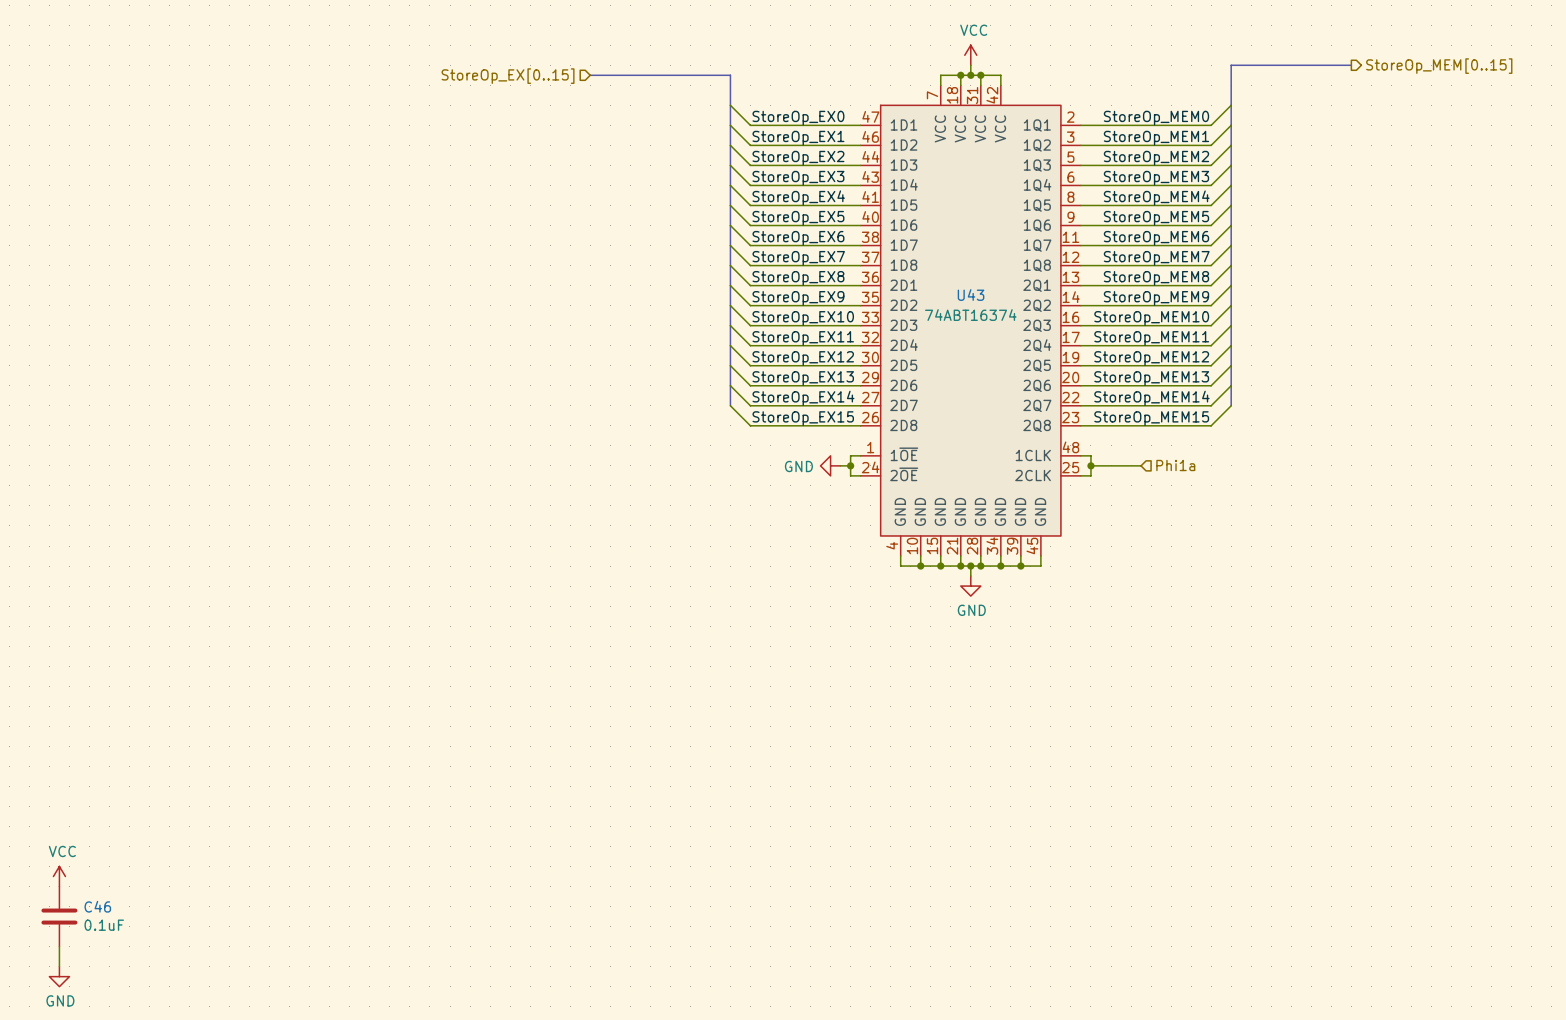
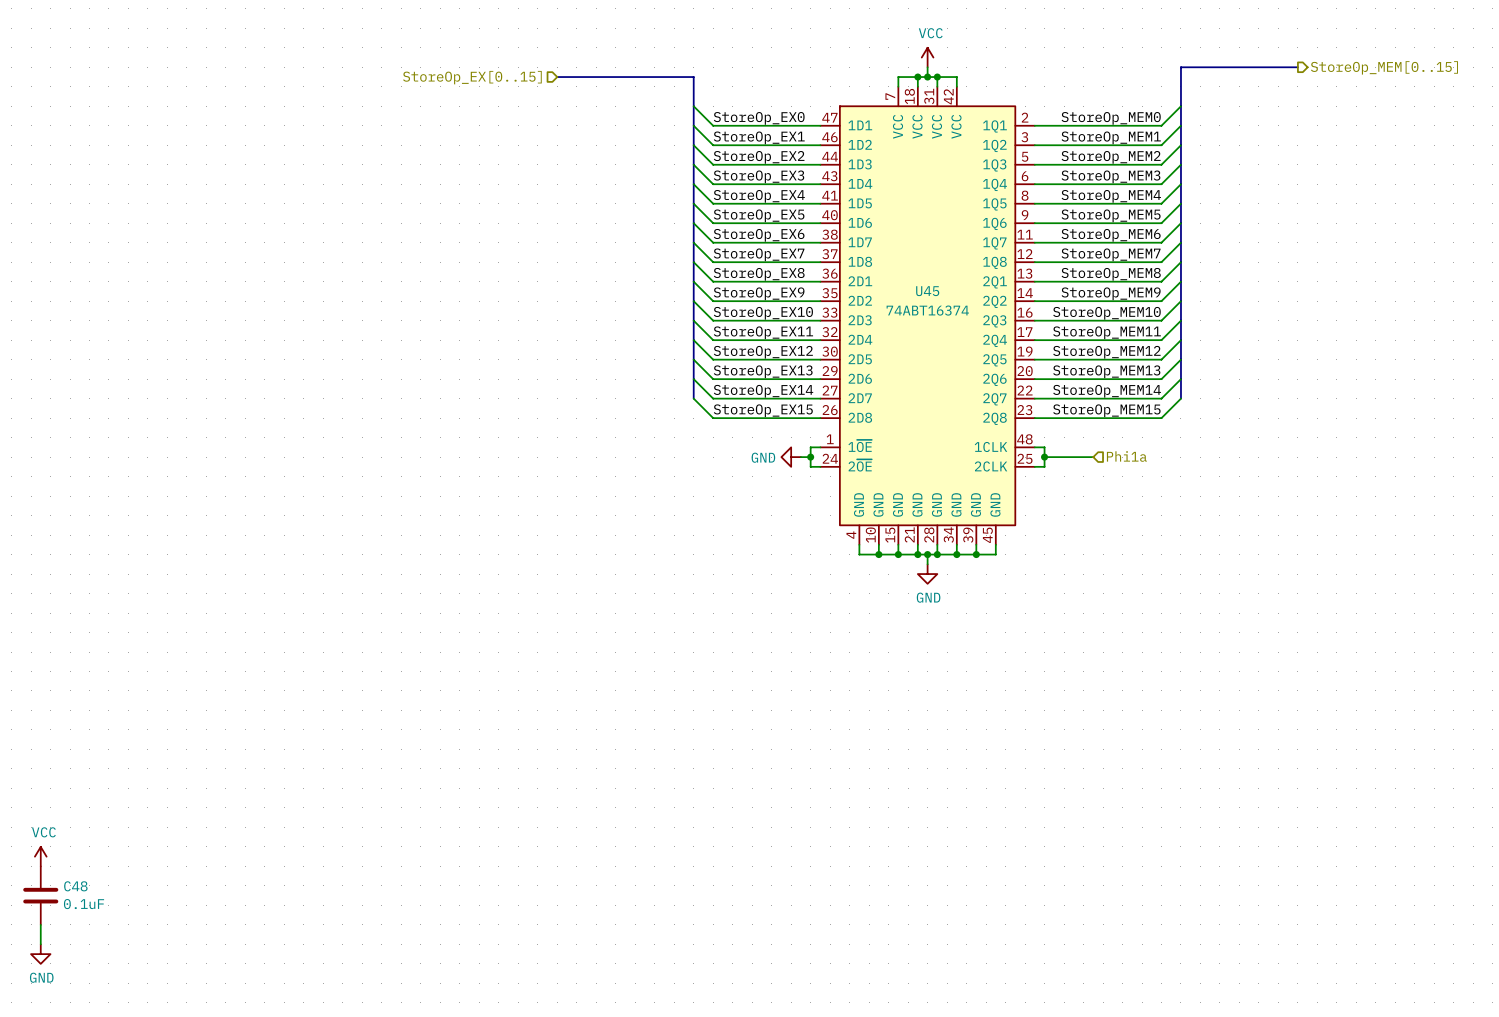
U43 name: U43 (971, 295) -> U45 (927, 291)
C46 name: C46 (97, 906) -> C48 (75, 886)

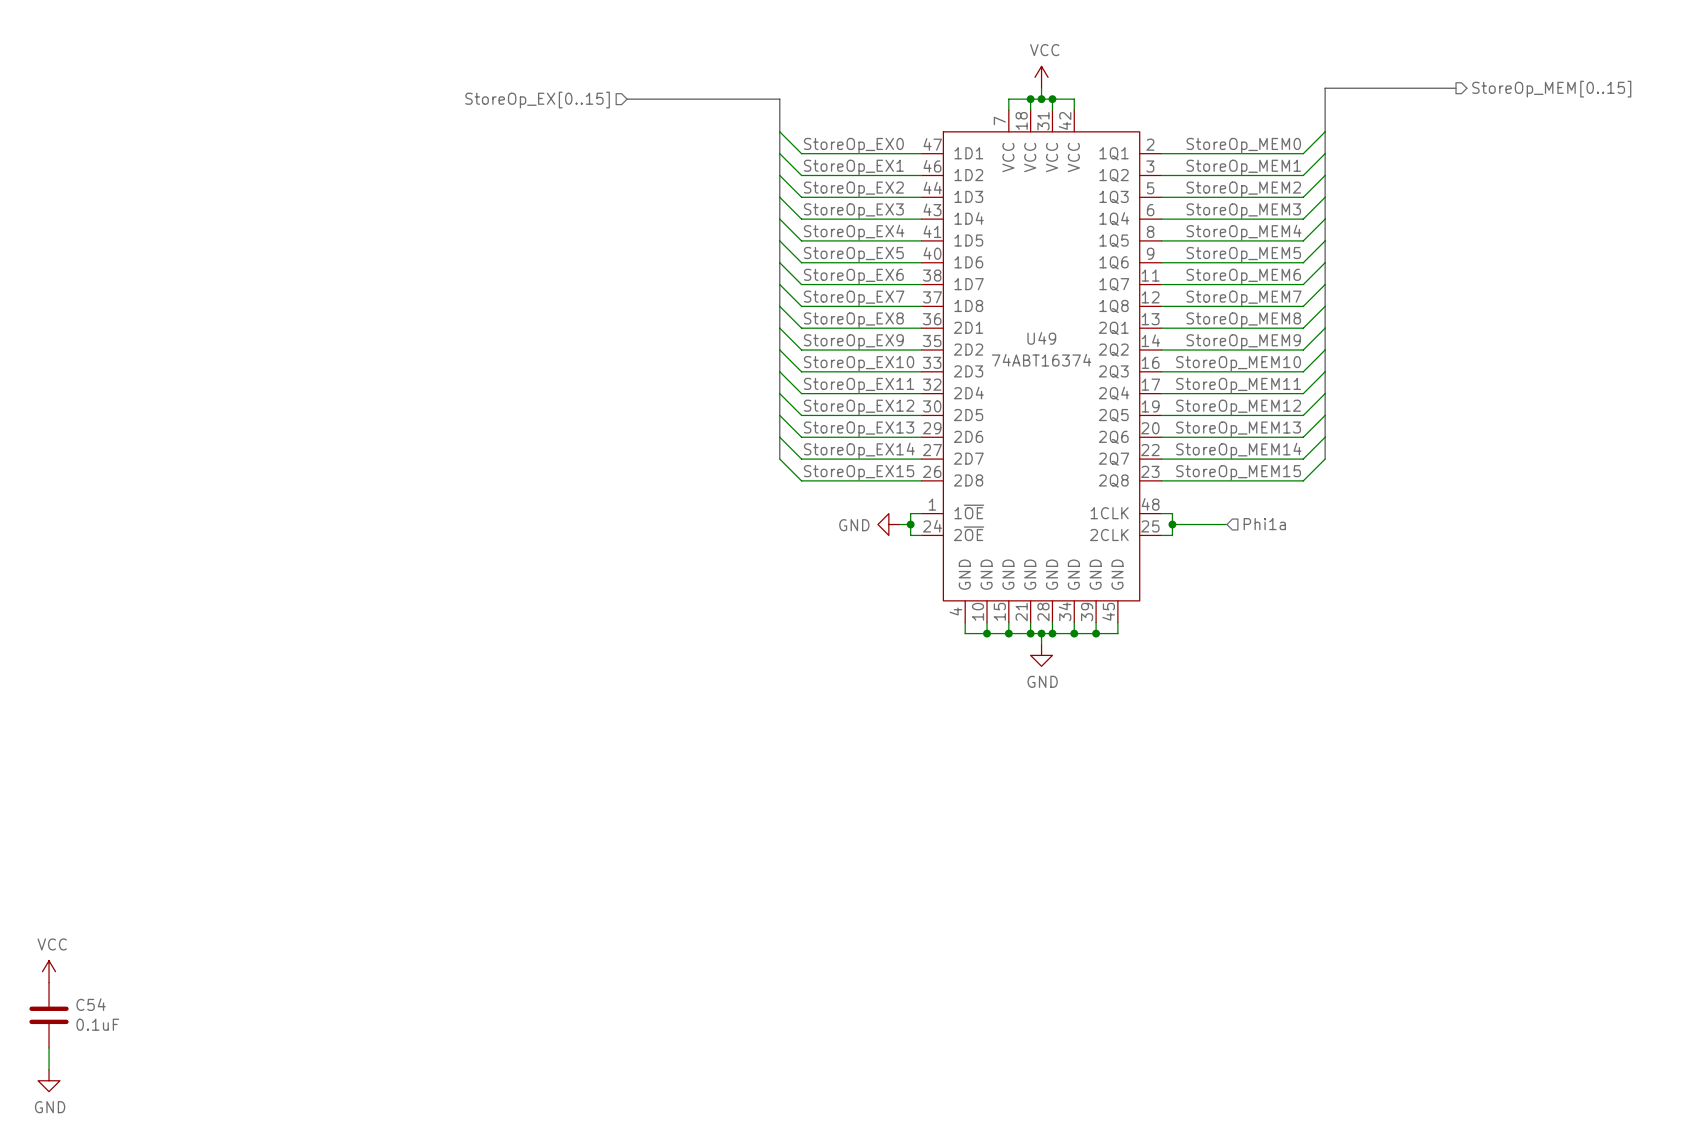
U45 name: U45 (927, 291) -> U49 (1041, 338)
C48 name: C48 (75, 886) -> C54 (91, 1004)

